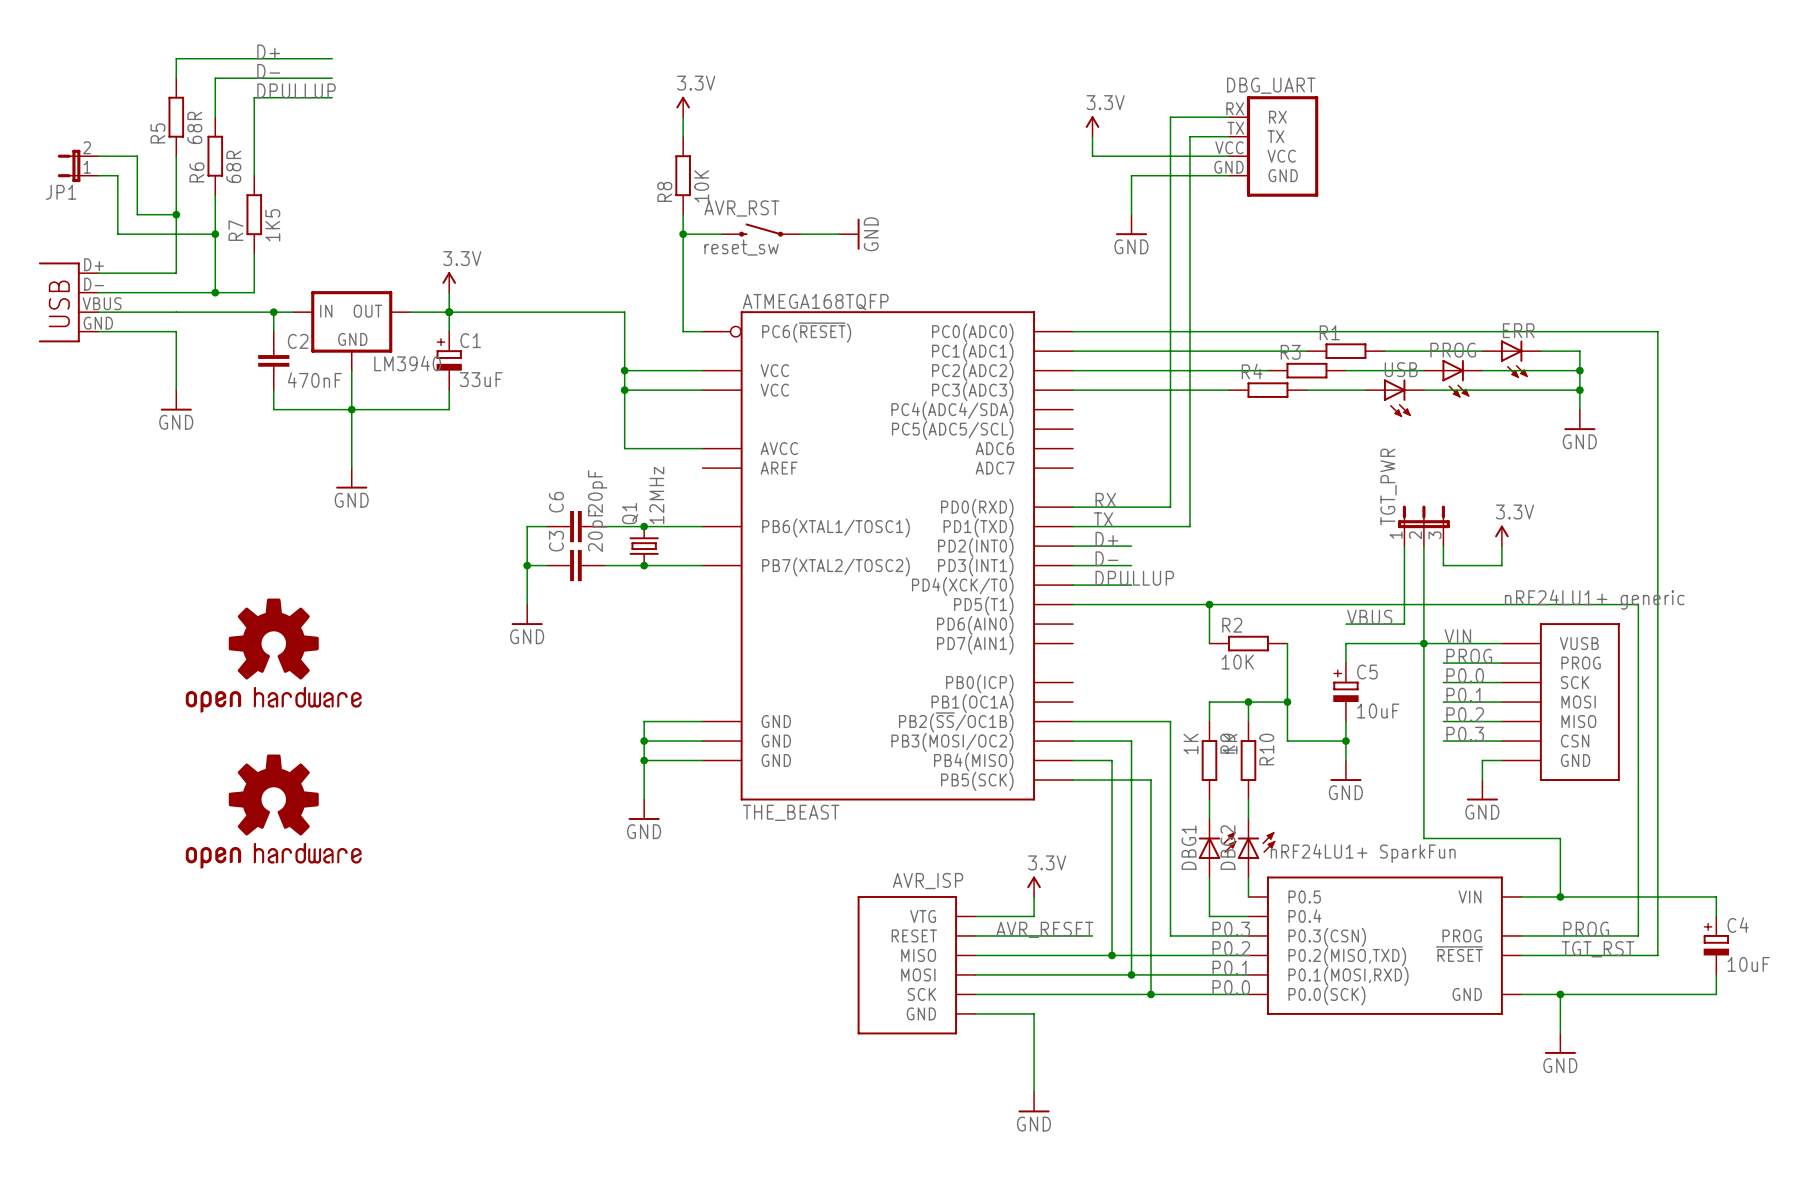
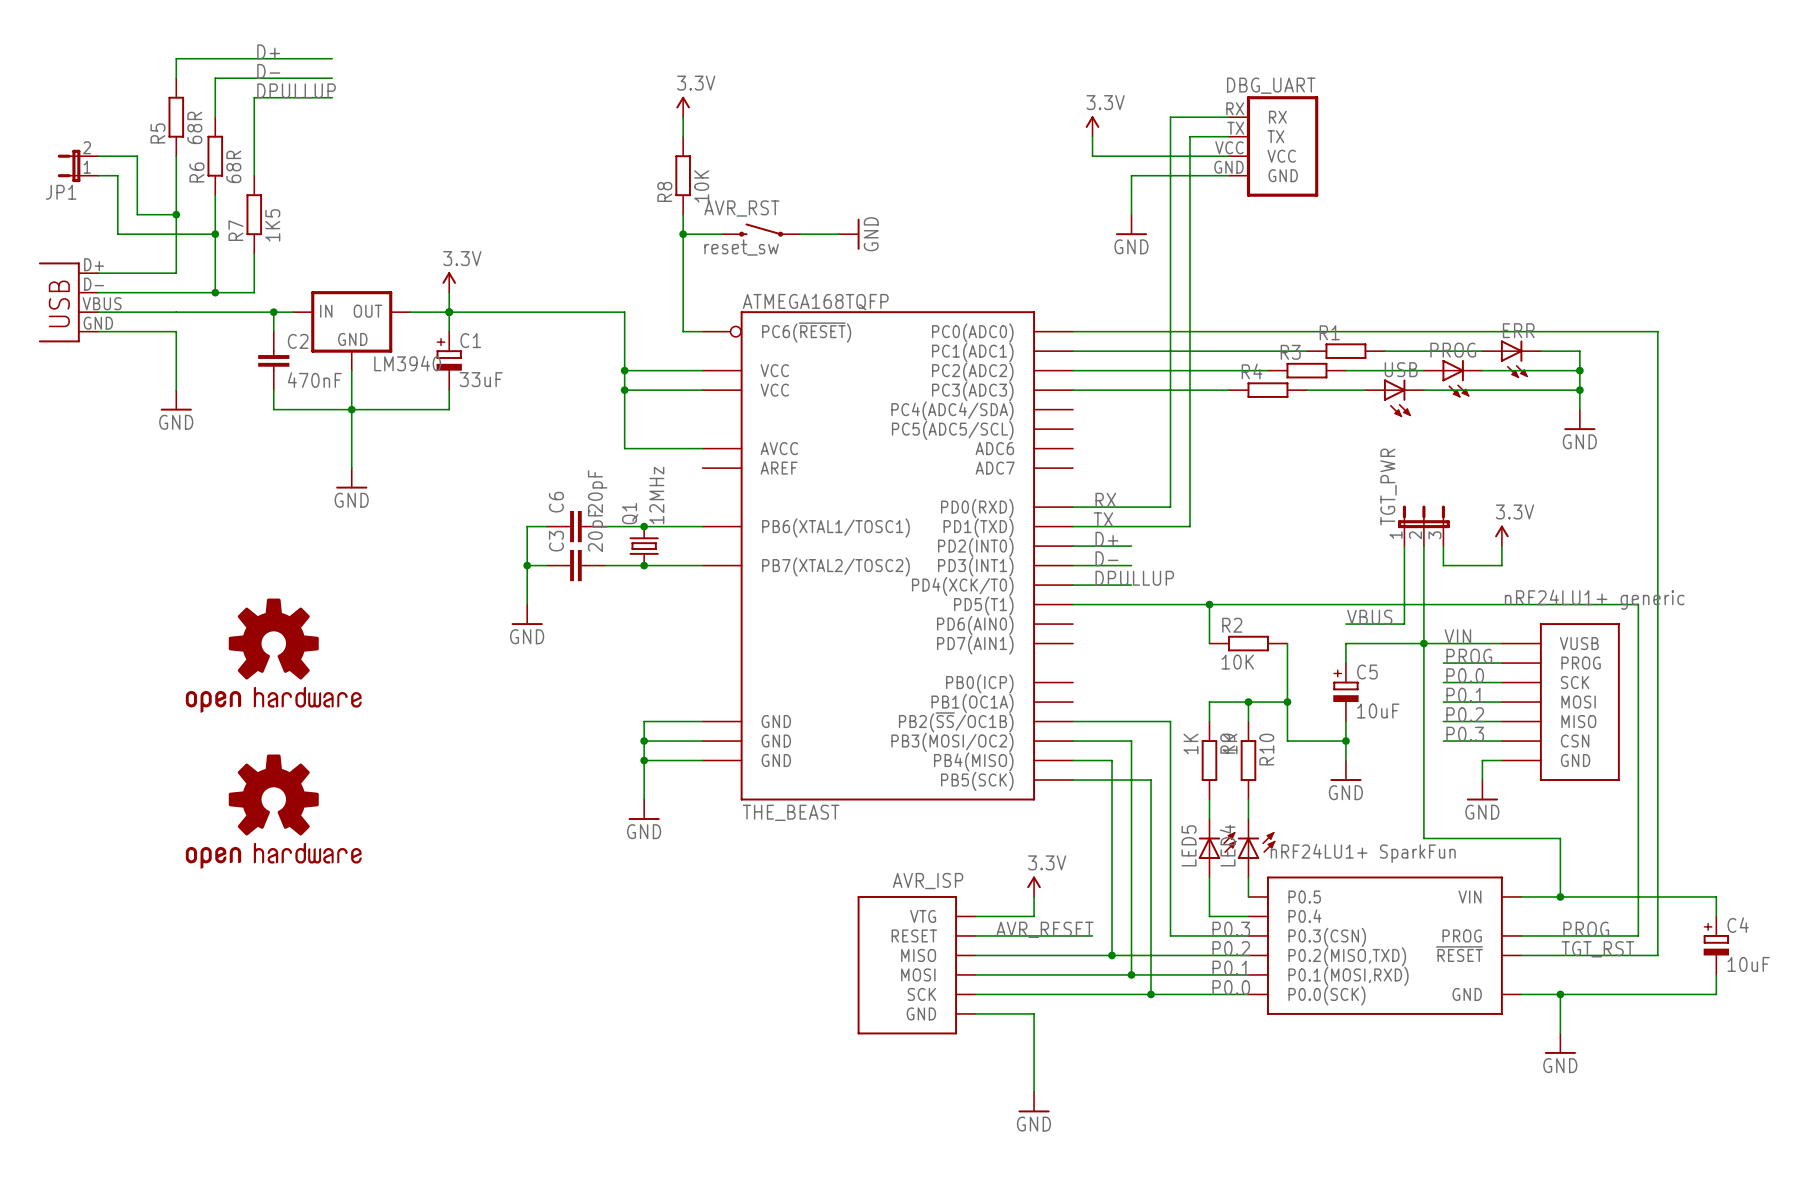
DBG1 name: DBG1 (1189, 847) -> LED5 (1189, 845)
DBG2 name: DBG2 (1228, 847) -> LED4 (1227, 845)

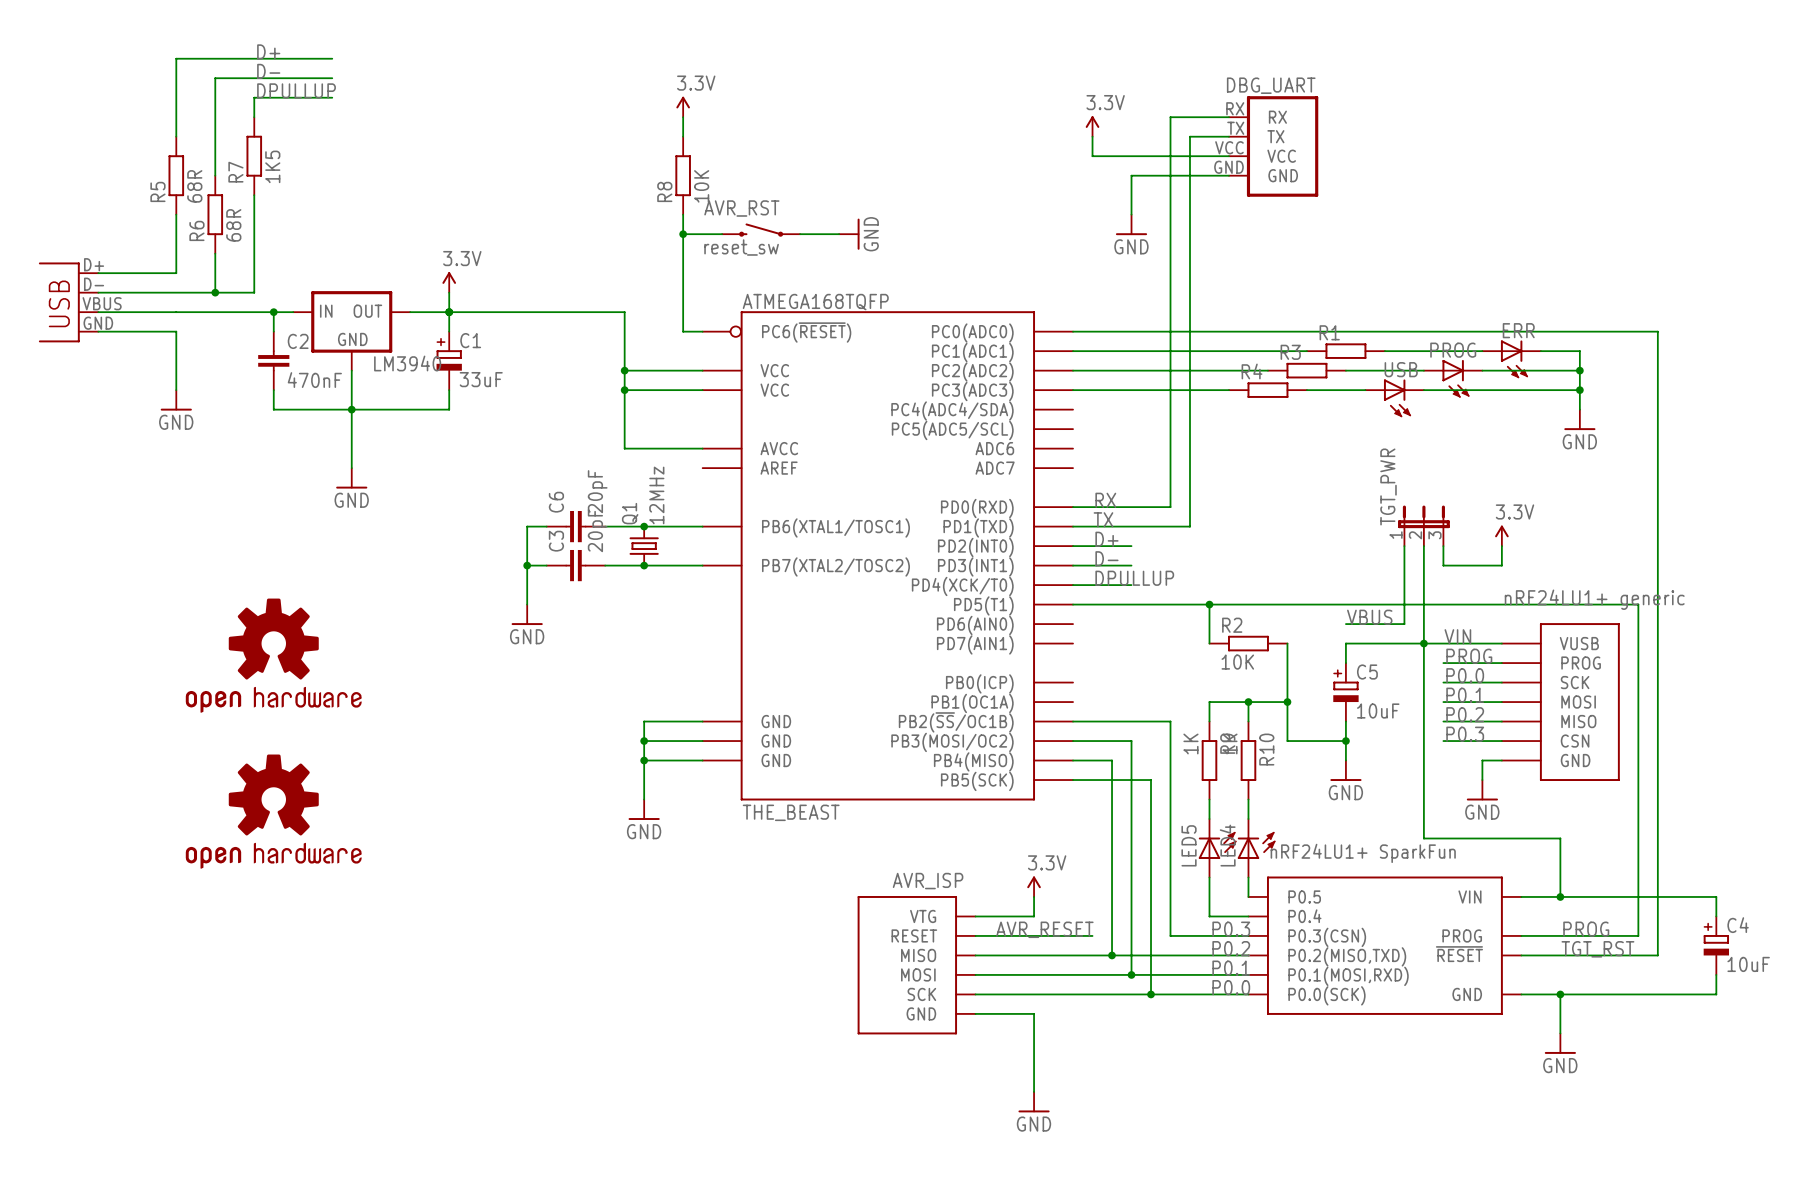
wire: none -> (176, 78) (176, 136)
R5 position: (176, 117) -> (176, 175)
wire: (254, 117) (254, 175) -> (215, 117) (215, 175)
wire: (98, 156) (137, 156) (137, 214) (176, 214) (176, 156) -> none
R6 position: (215, 156) -> (215, 214)
JP1: (78, 165) -> none
wire: (98, 175) (117, 175) (117, 234) (215, 234) -> none
wire: (215, 195) (215, 253) -> (254, 195) (254, 253)
junction: (176, 214) -> none
R7 position: (254, 214) -> (254, 156)
junction: (215, 234) -> none

